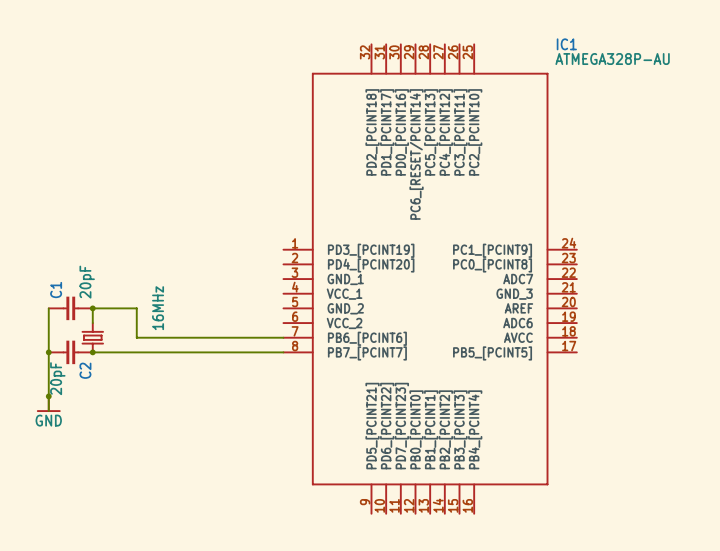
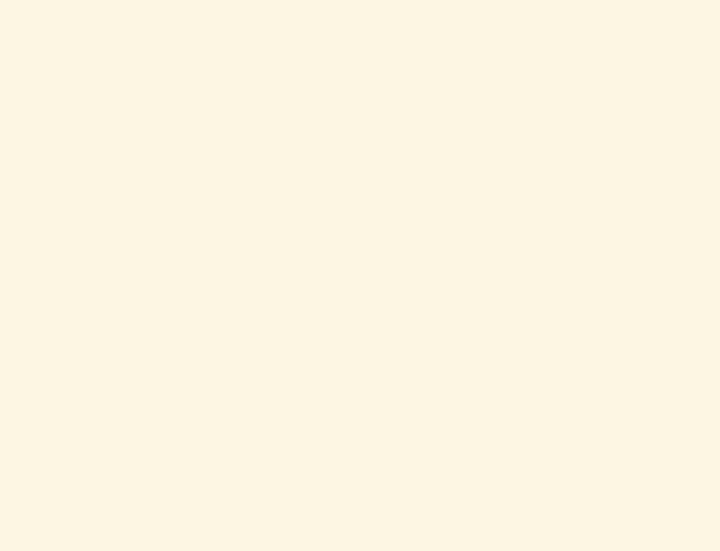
IC1: ATMEGA328P-AU (430, 279) -> none
wire: (48, 308) (48, 411) -> none
C1: 20pF (70, 308) -> none
junction: (92, 308) -> none
wire: (92, 323) (92, 308) (136, 308) (136, 337) (283, 337) -> none
part: 16MHz (92, 337) -> none
junction: (48, 352) -> none
C2: 20pF (70, 352) -> none
wire: (92, 352) (283, 352) -> none
junction: (92, 352) -> none
junction: (48, 396) -> none
power symbol: GND (48, 404) -> none

